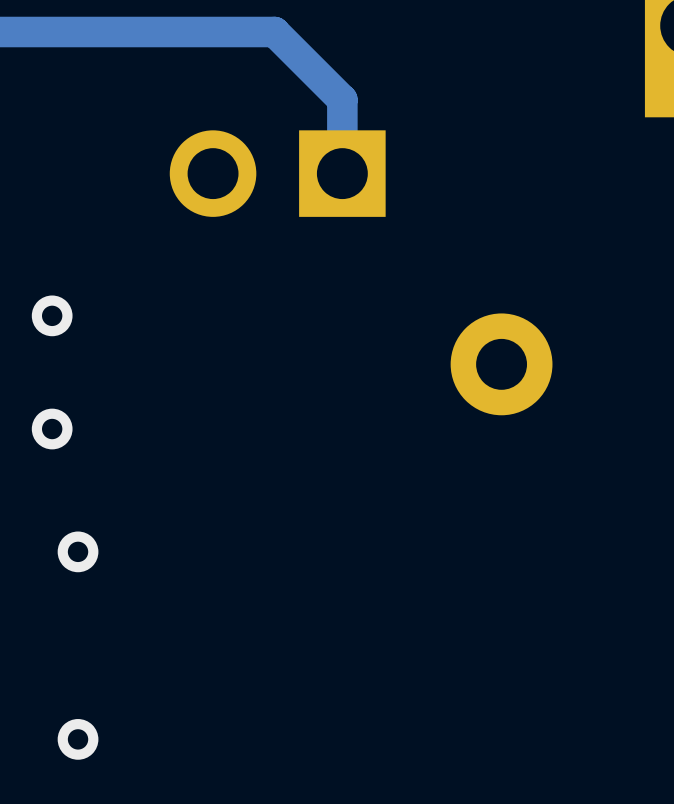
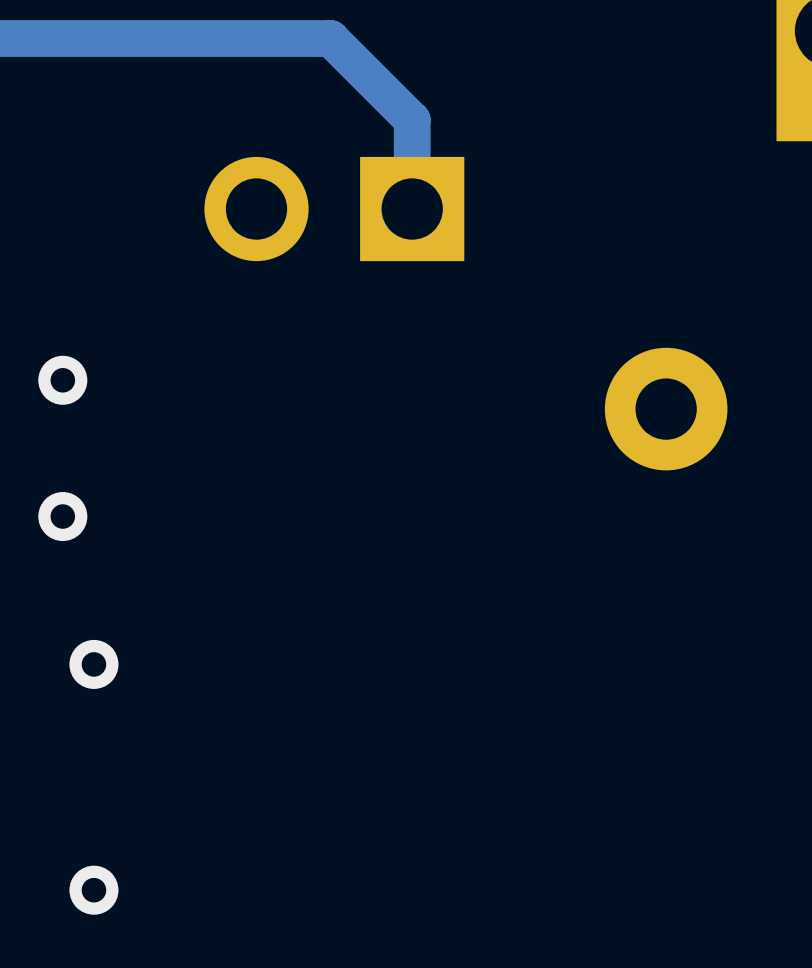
part position: (501, 364) -> (666, 409)

